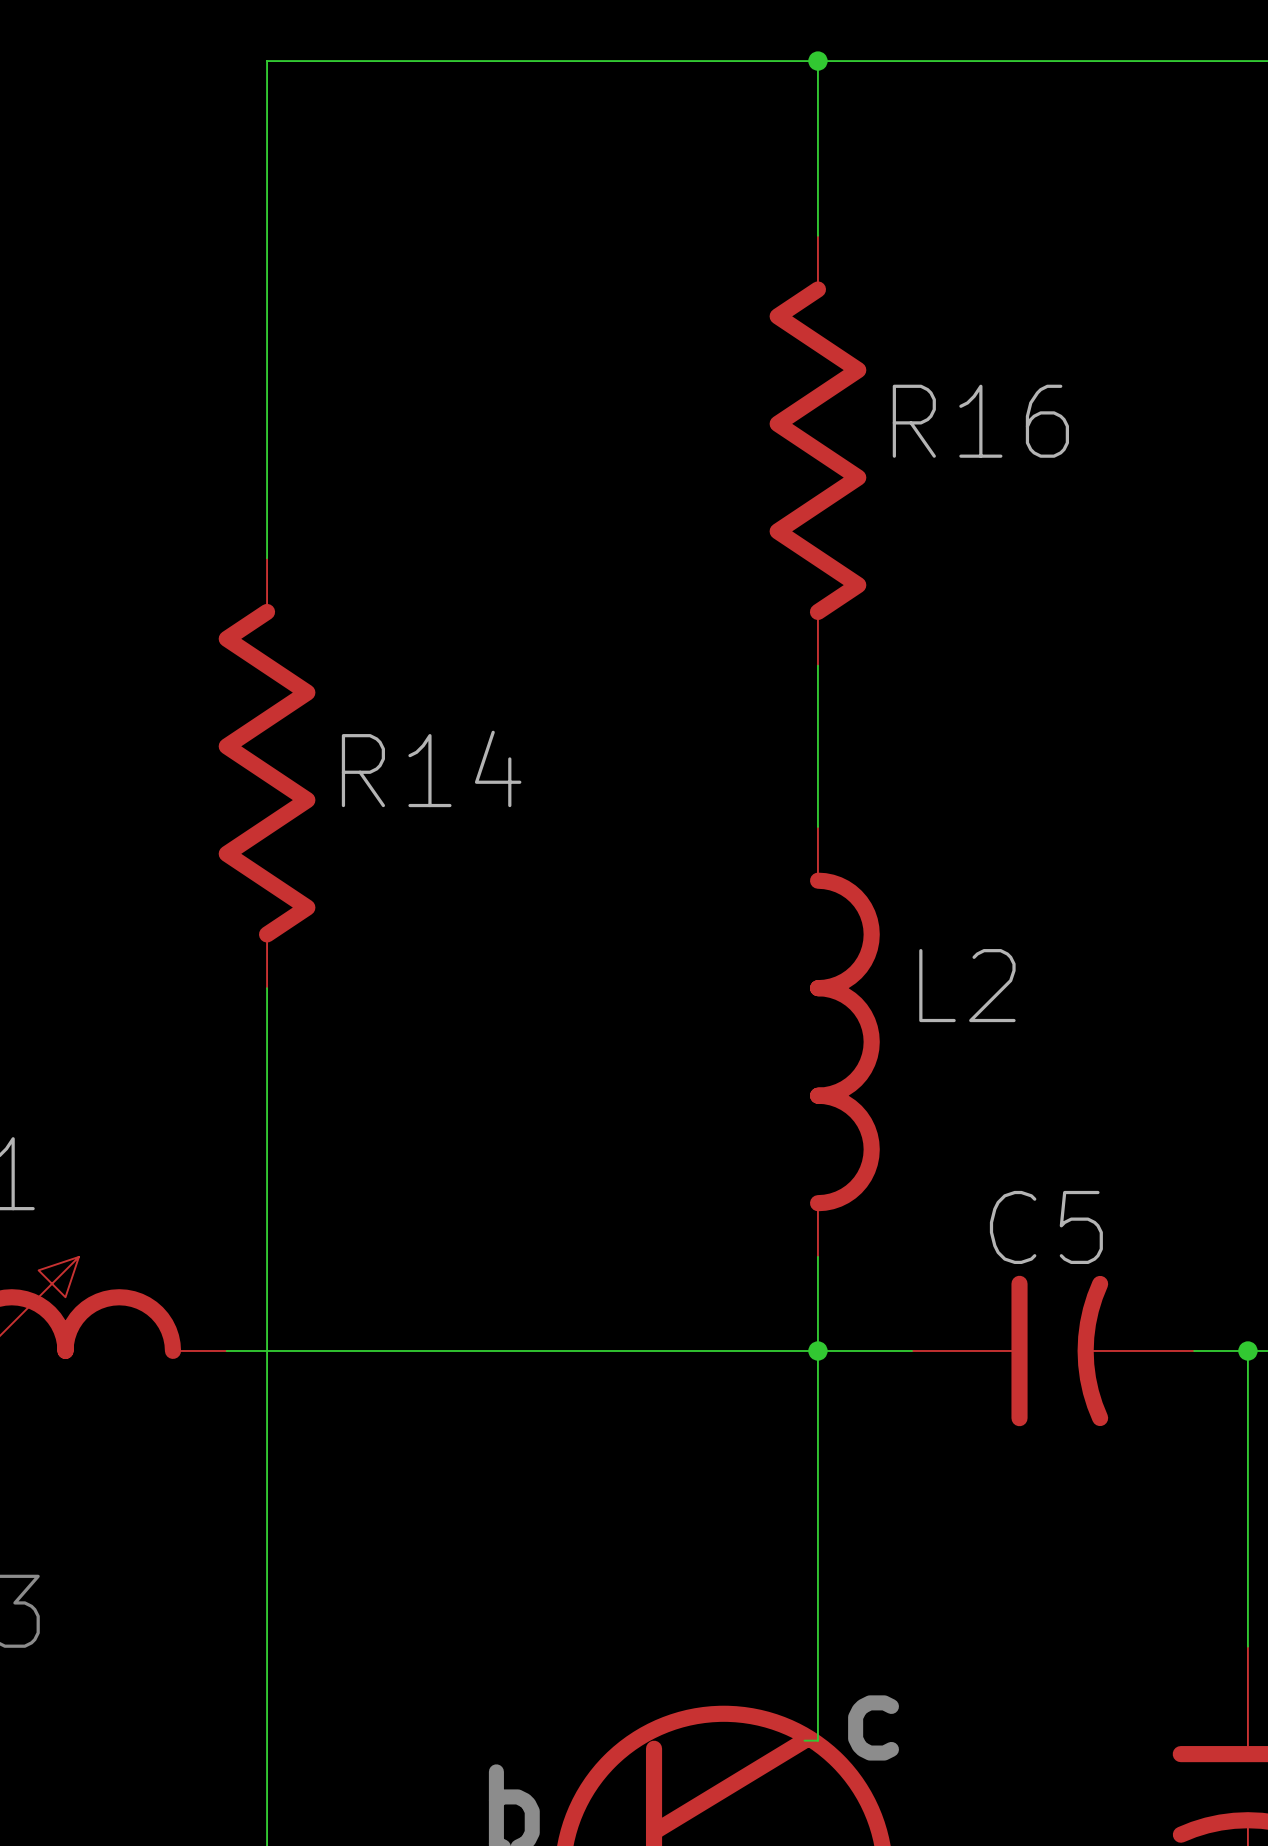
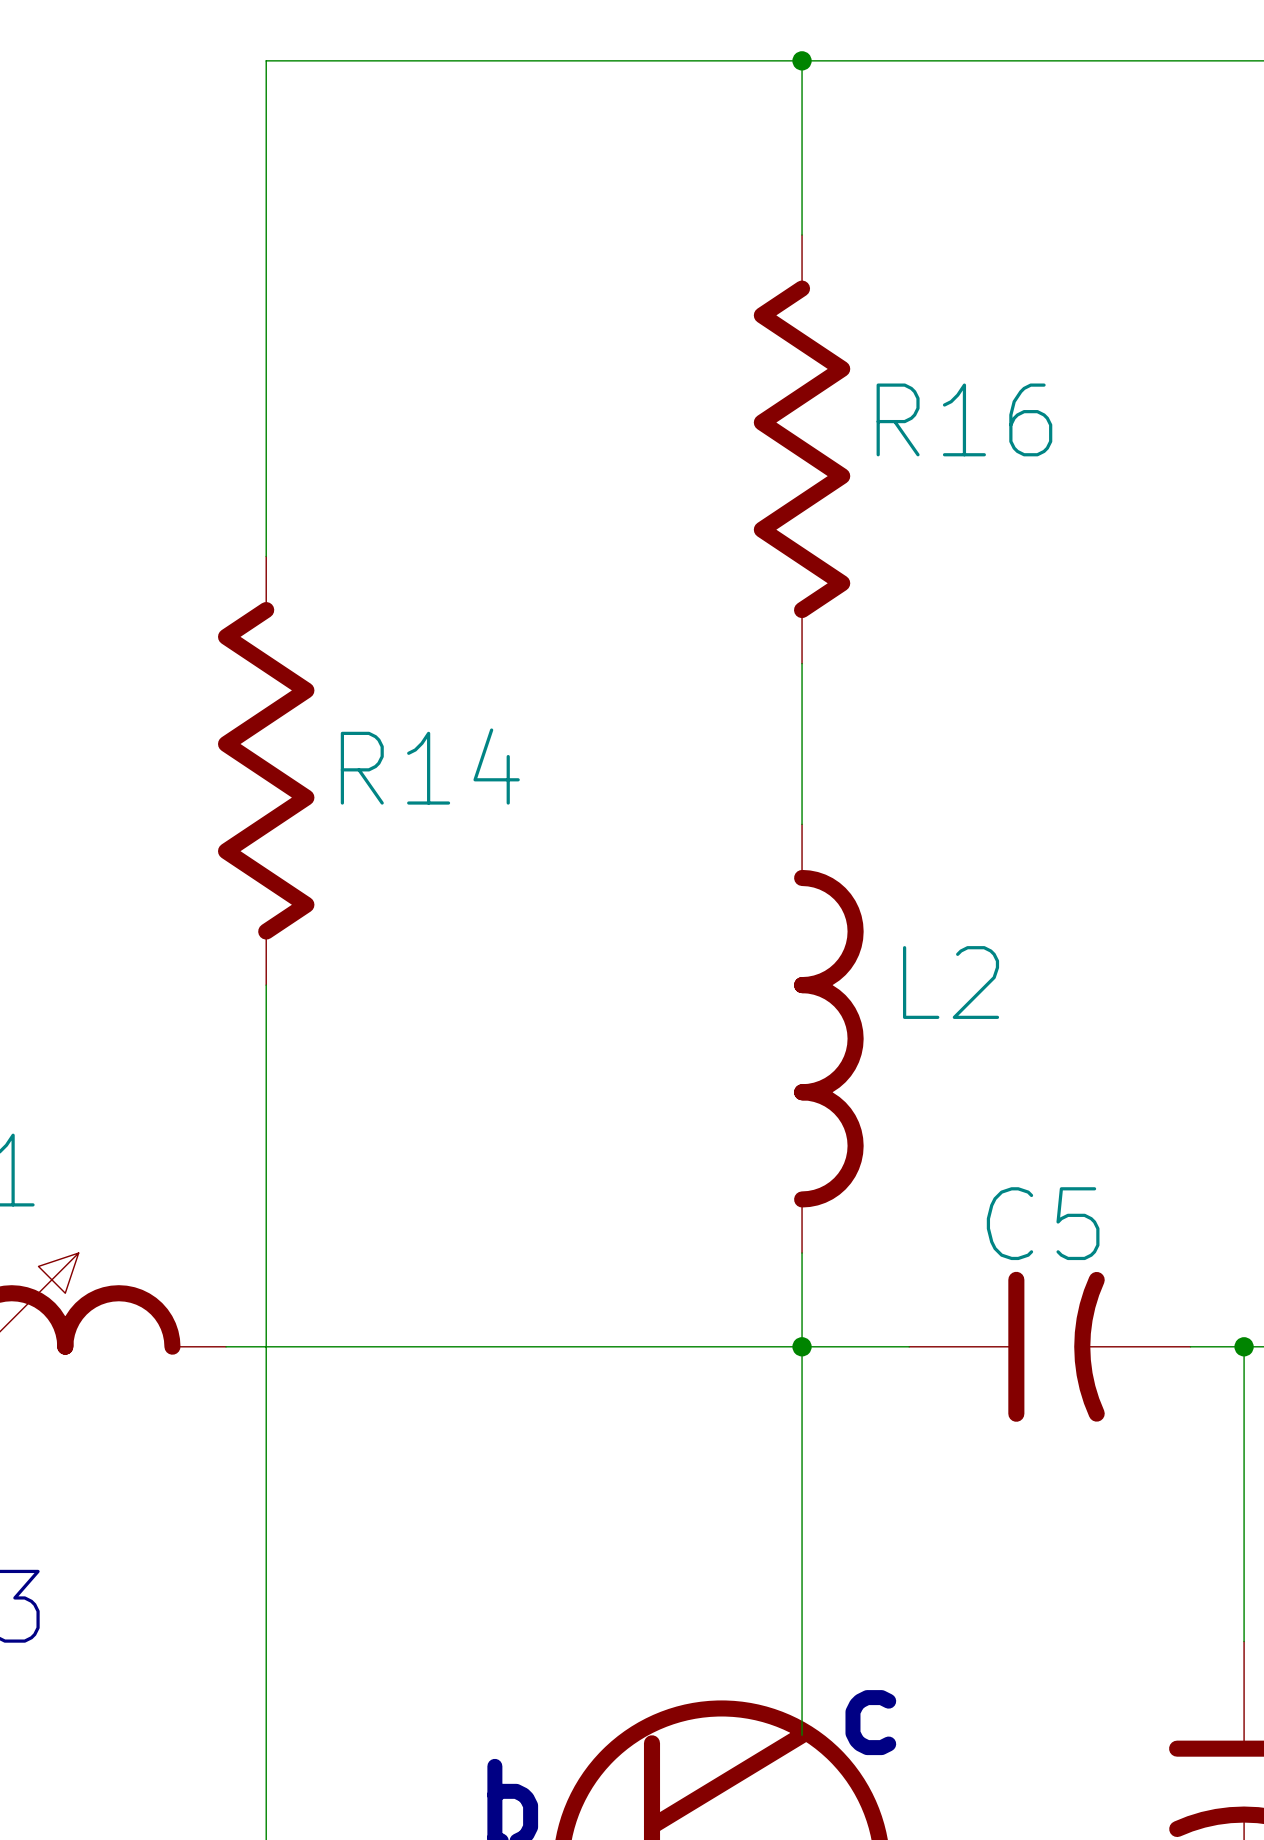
wire: (817, 61) (817, 235) -> (802, 60) (802, 234)
junction position: (817, 61) -> (802, 60)
R16 position: (817, 450) -> (802, 449)
wire: (817, 665) (817, 826) -> (802, 663) (802, 824)
L2 position: (844, 1041) -> (828, 1038)
wire: (817, 1256) (817, 1740) (804, 1740) -> (802, 1253) (802, 1735)
junction position: (817, 1350) -> (802, 1346)

